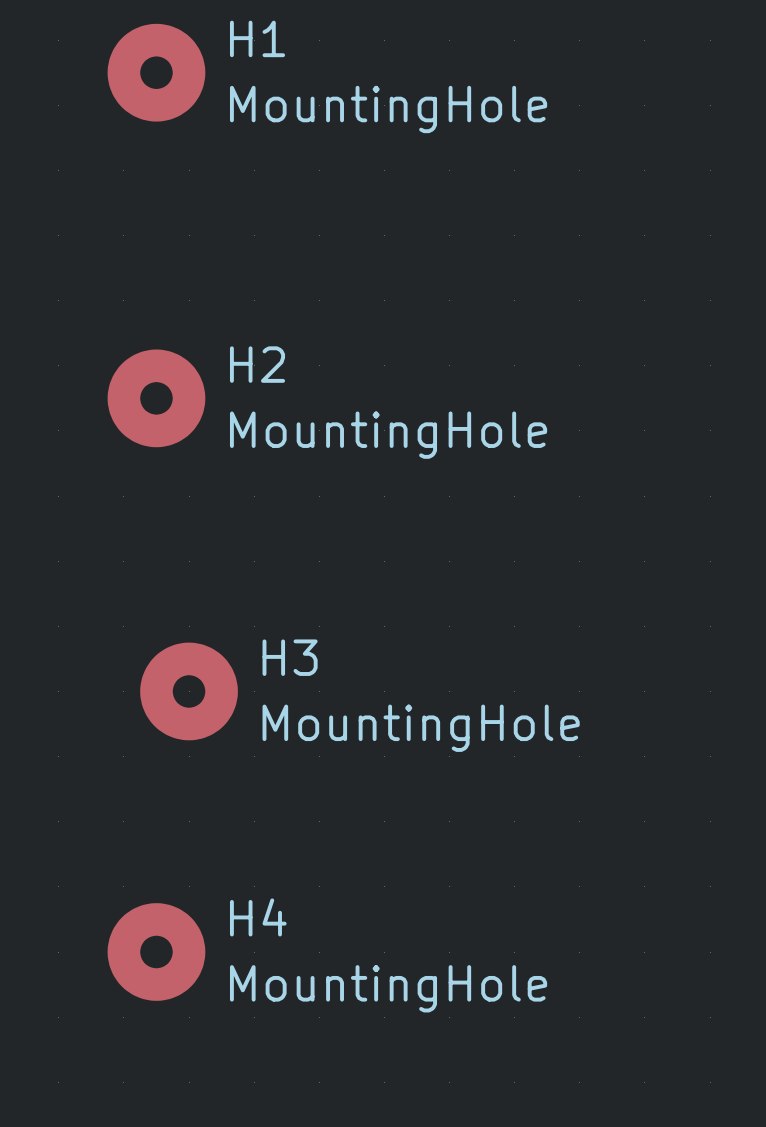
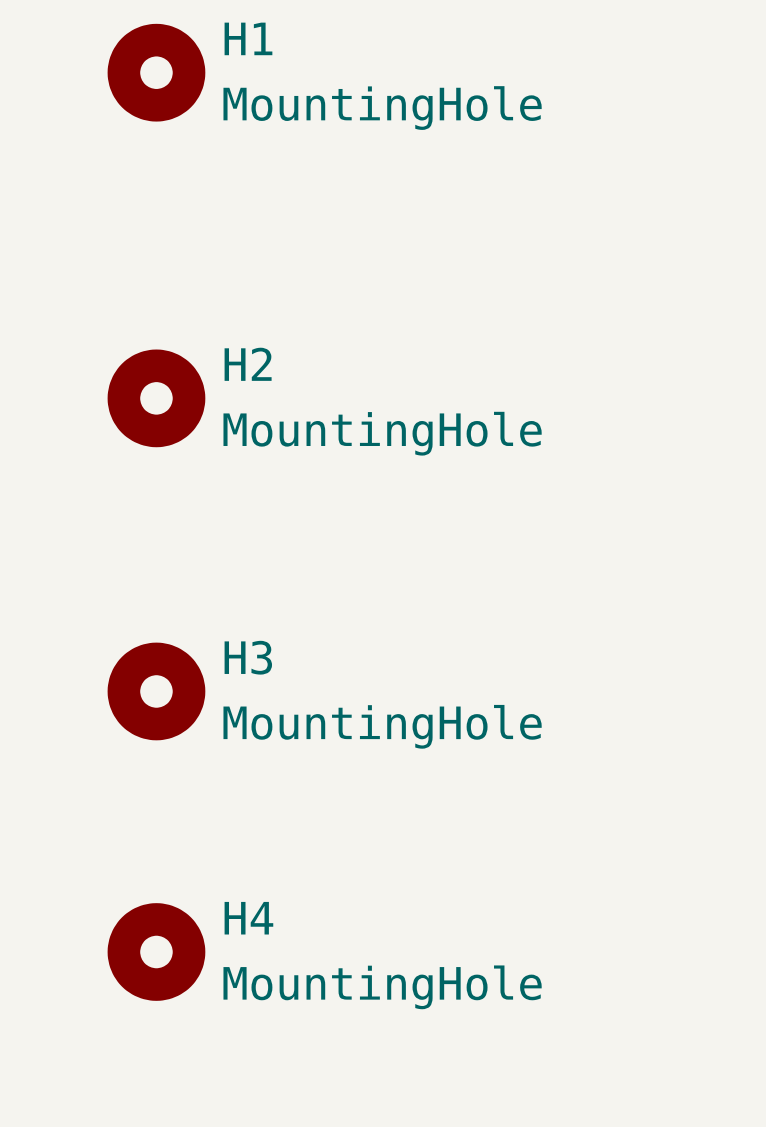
H3 position: (189, 691) -> (156, 691)

